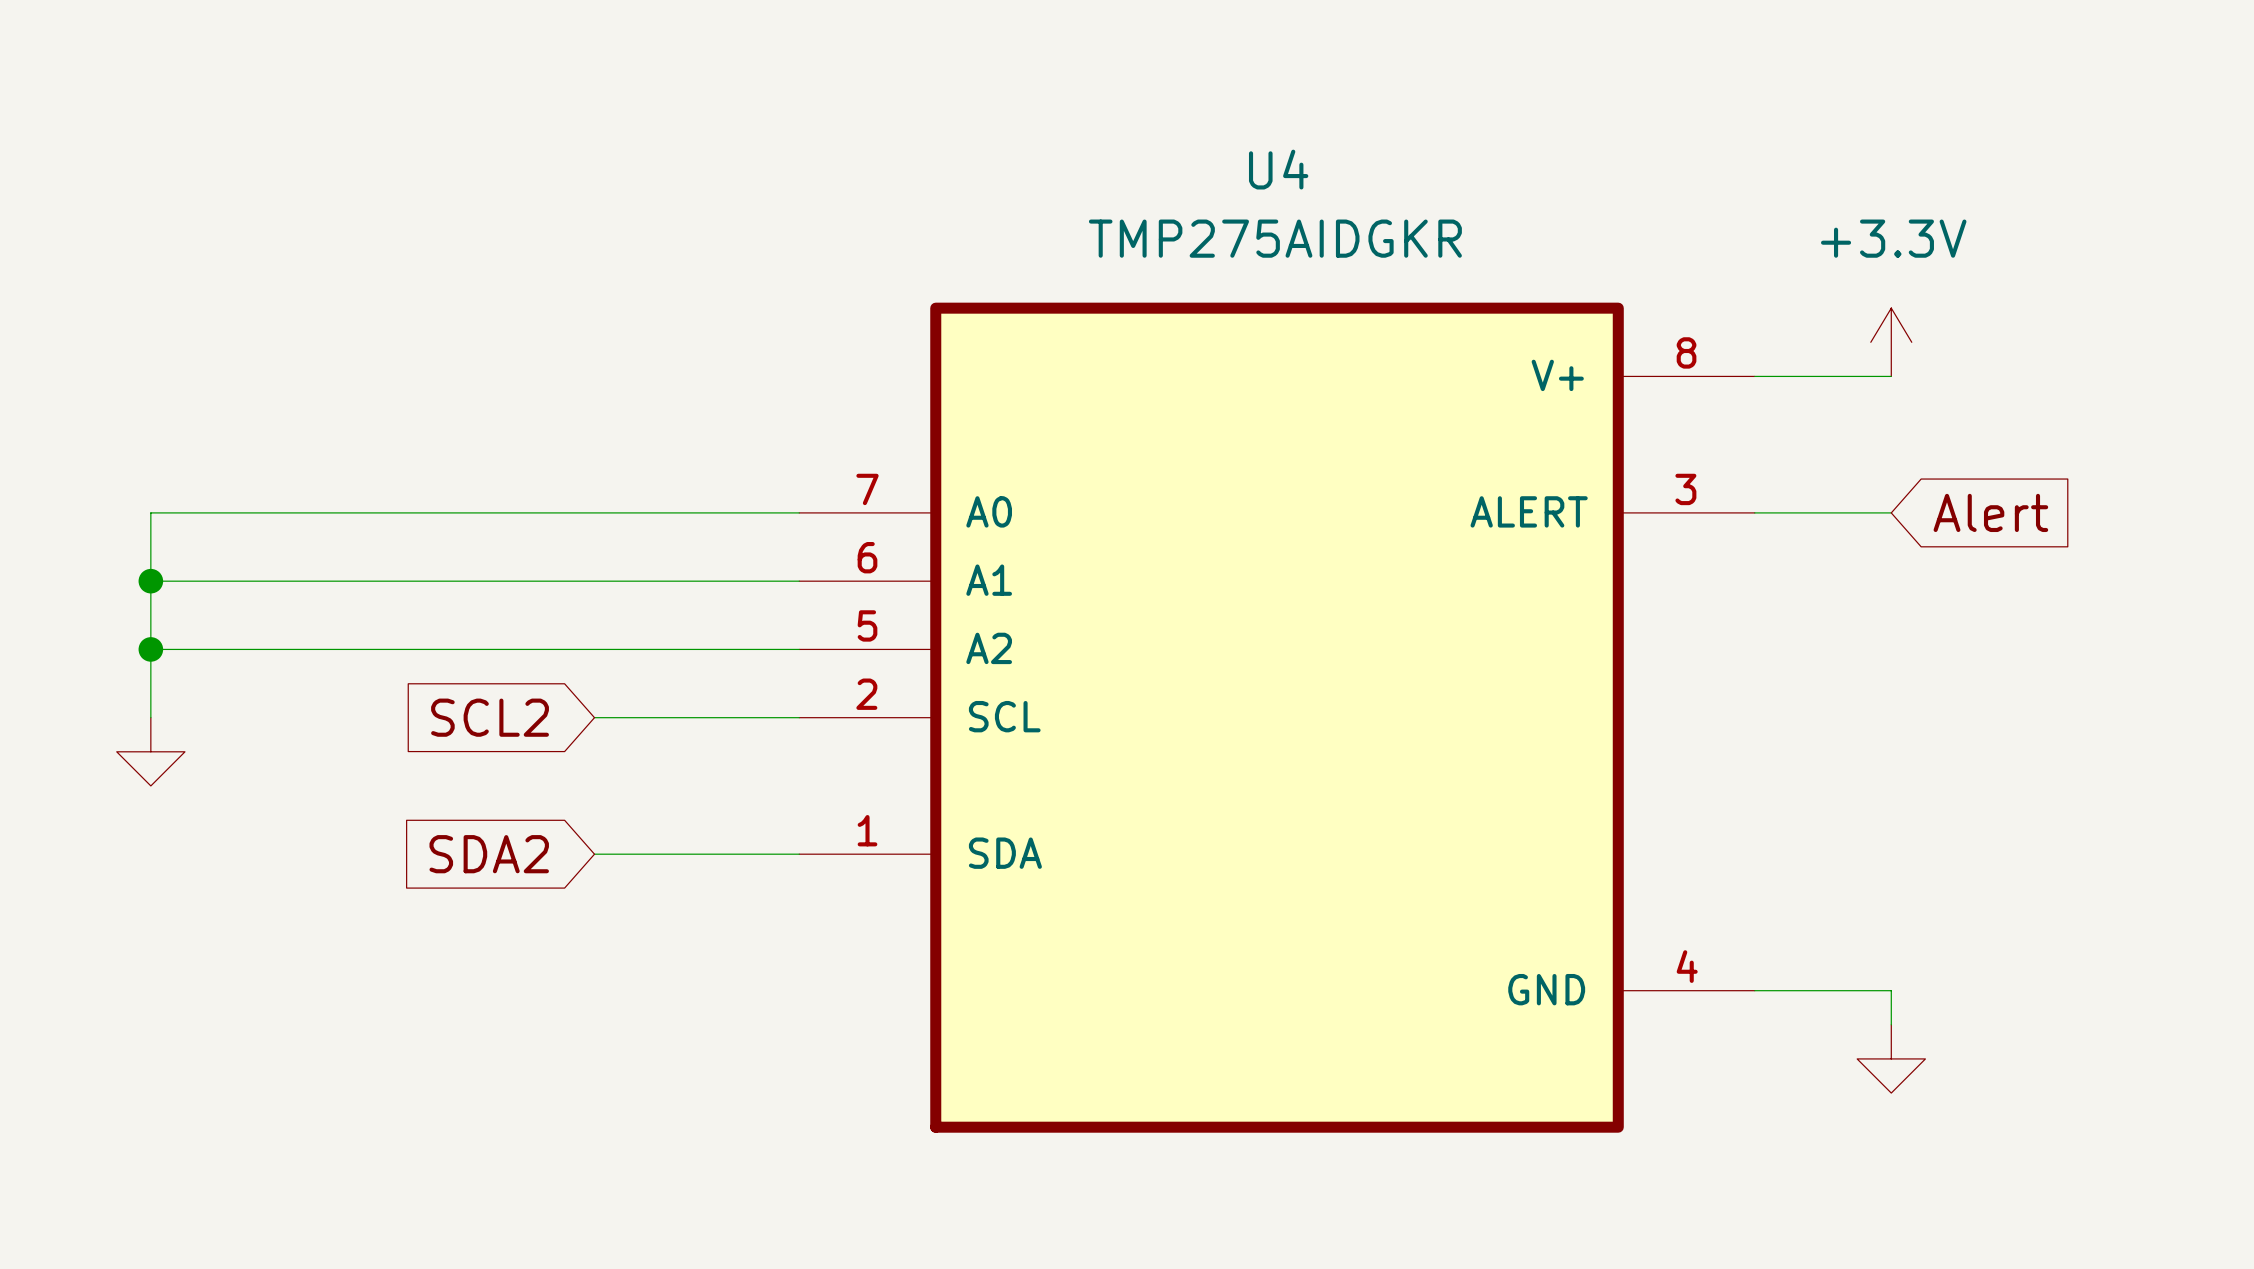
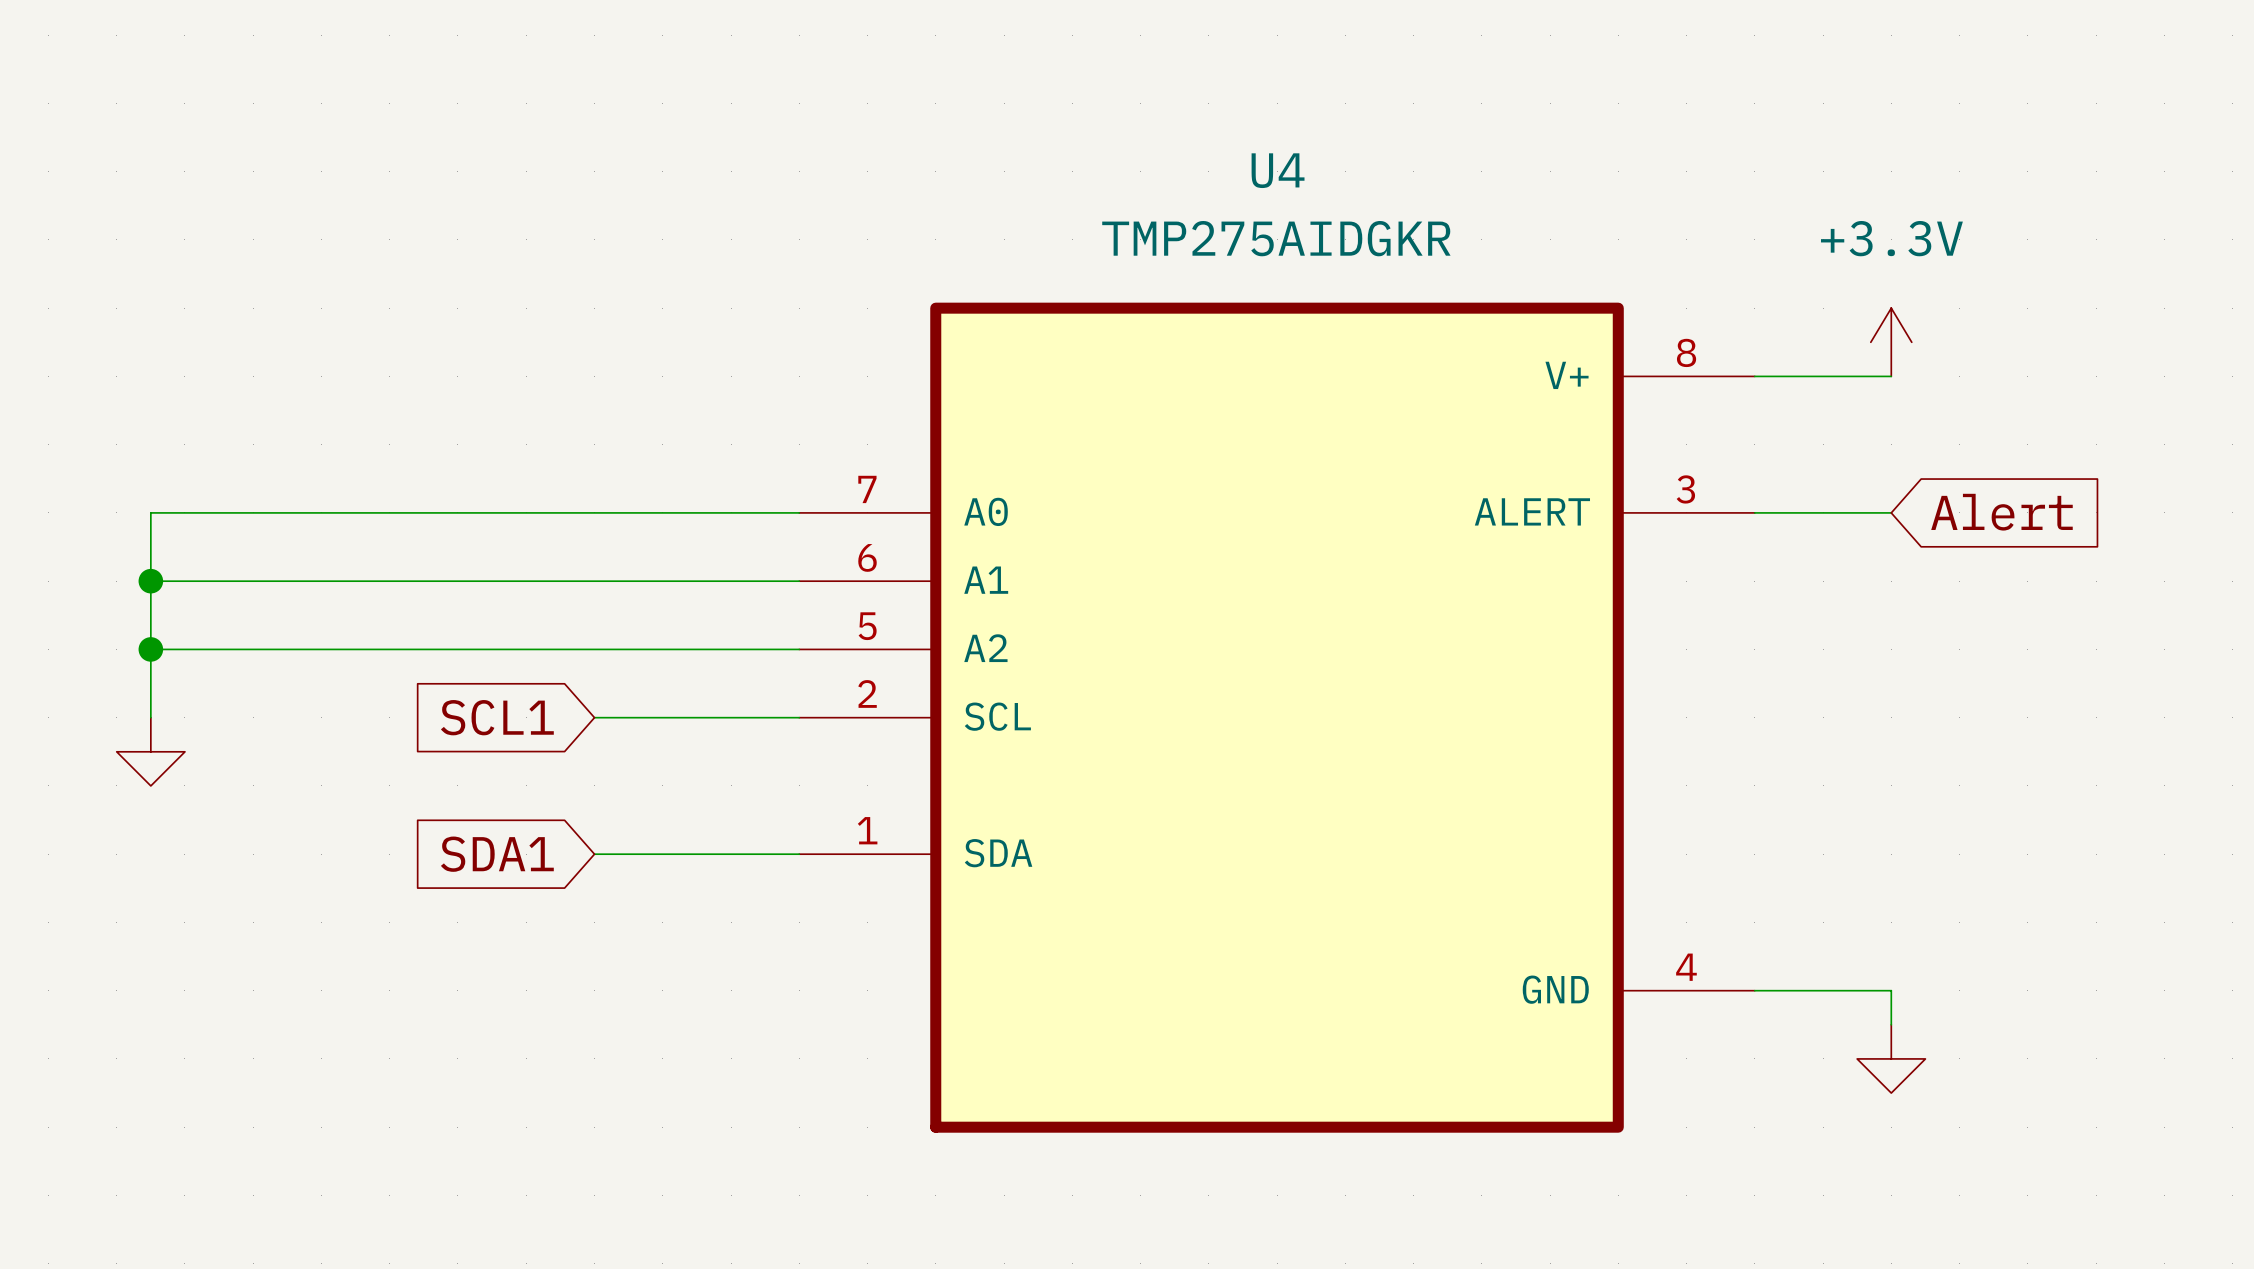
global label: SCL2 (490, 717) -> SCL1 (497, 717)
global label: SDA2 (489, 854) -> SDA1 (497, 854)

